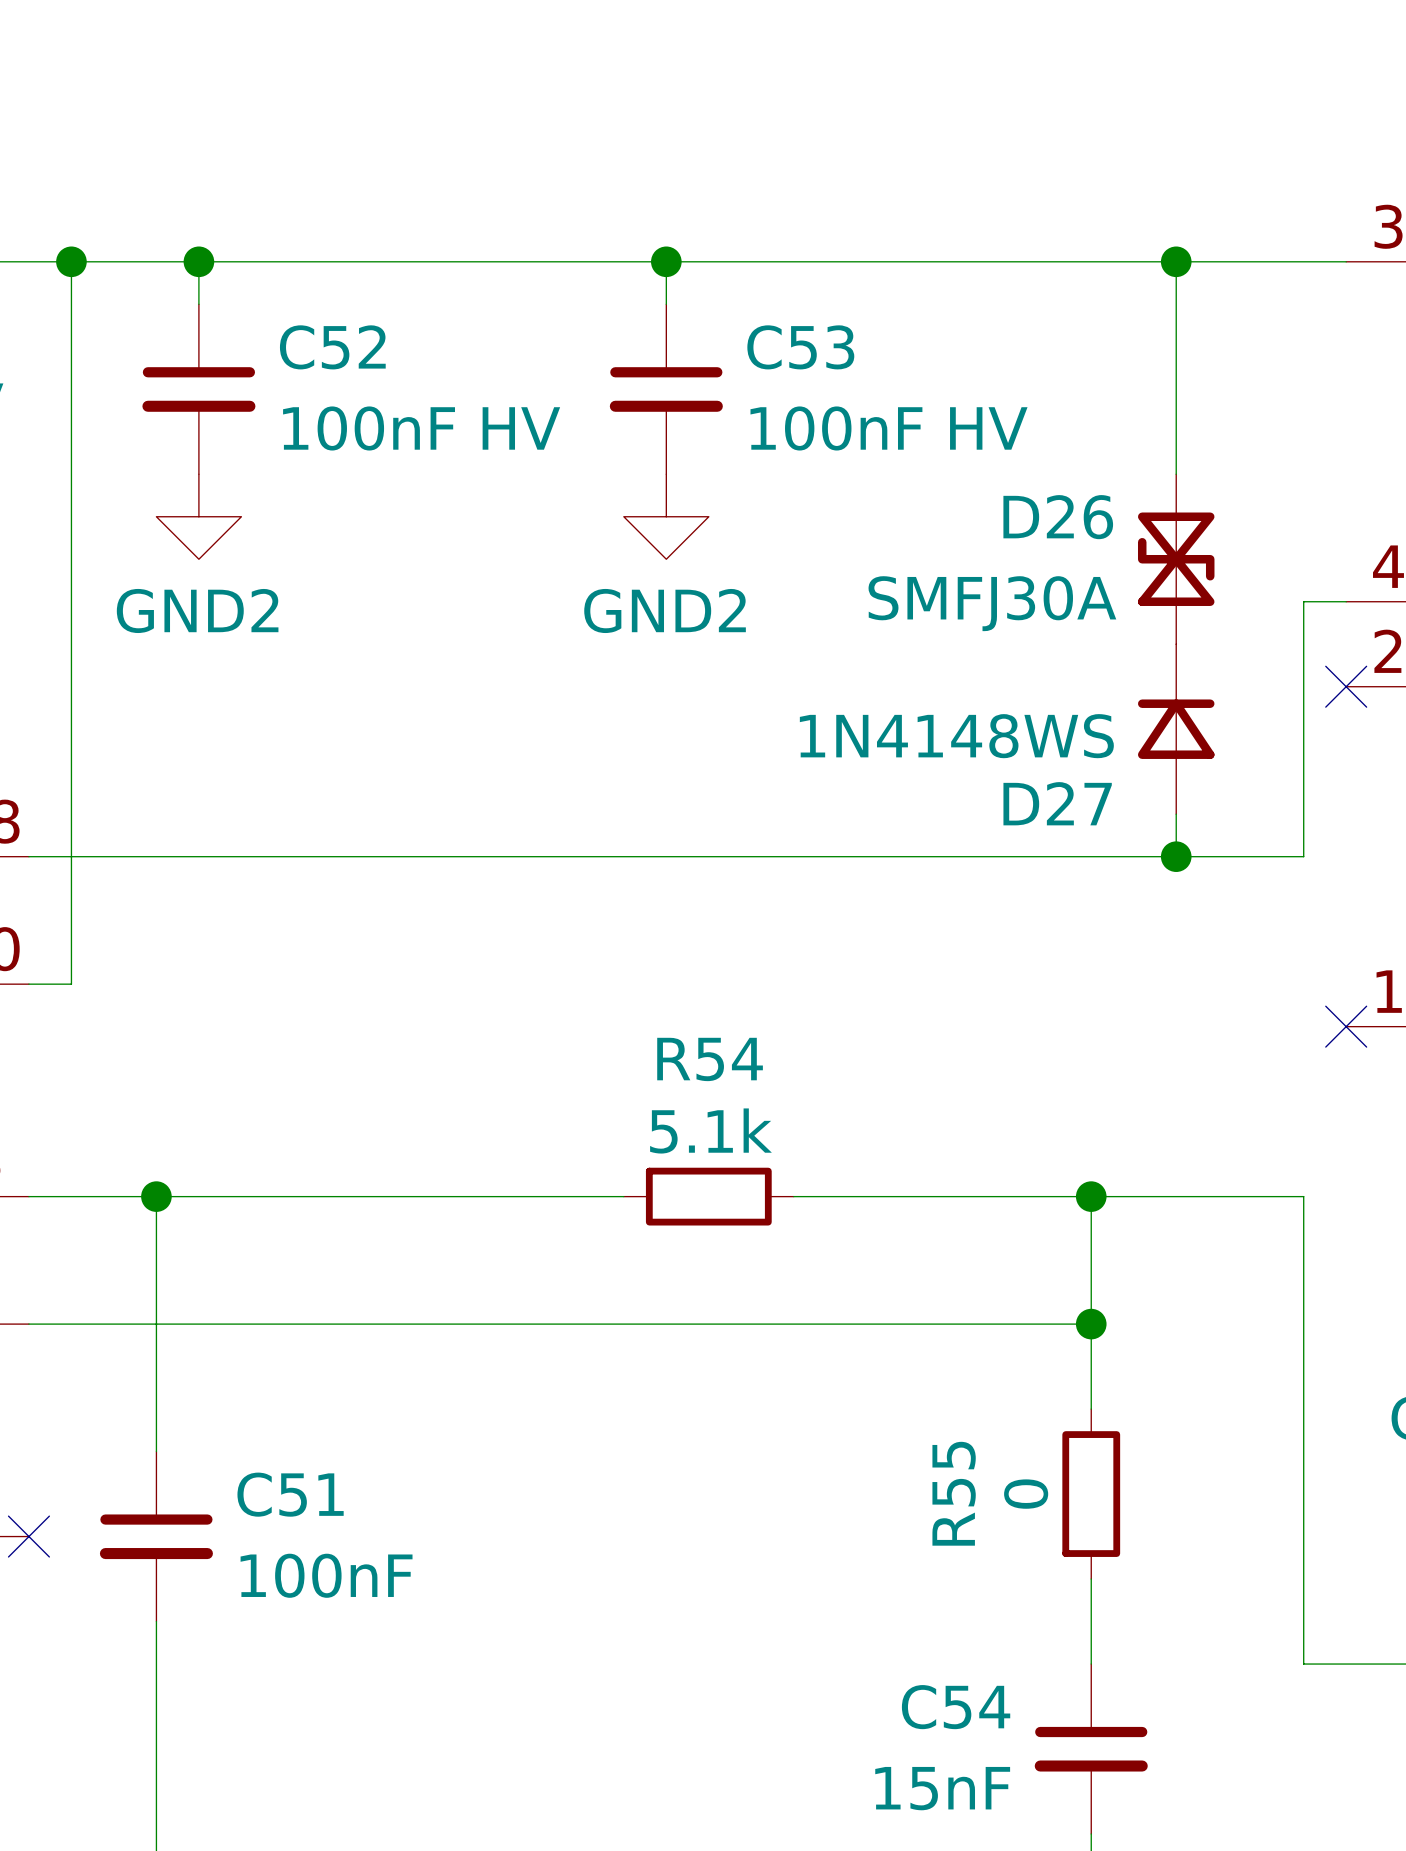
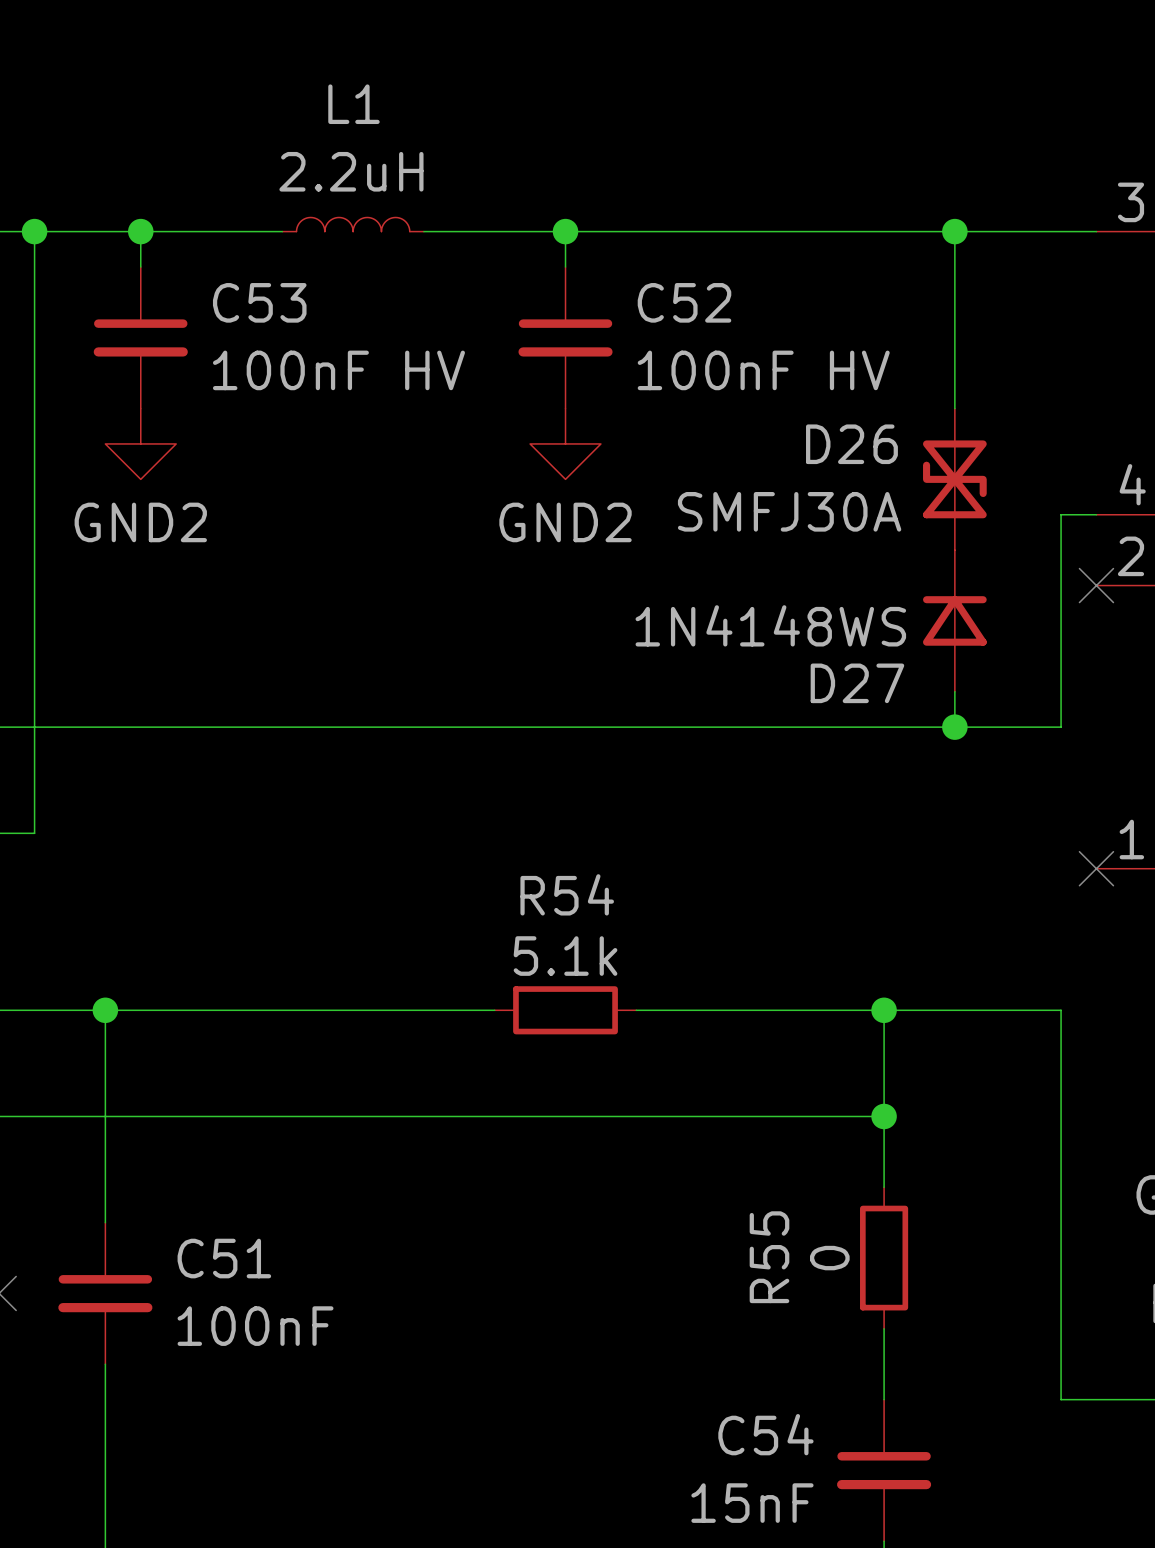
L1: none -> 2.2uH (353, 224)
wire: (368, 261) (538, 261) -> none
wire: (666, 261) (666, 304) -> (565, 231) (565, 266)
junction position: (666, 261) -> (565, 231)
C52 name: C52 (332, 347) -> C53 (259, 302)
C53: 100nF HV (666, 389) -> none
C52: none -> 100nF HV (565, 337)
power symbol position: GND2 (666, 516) -> GND2 (565, 443)

